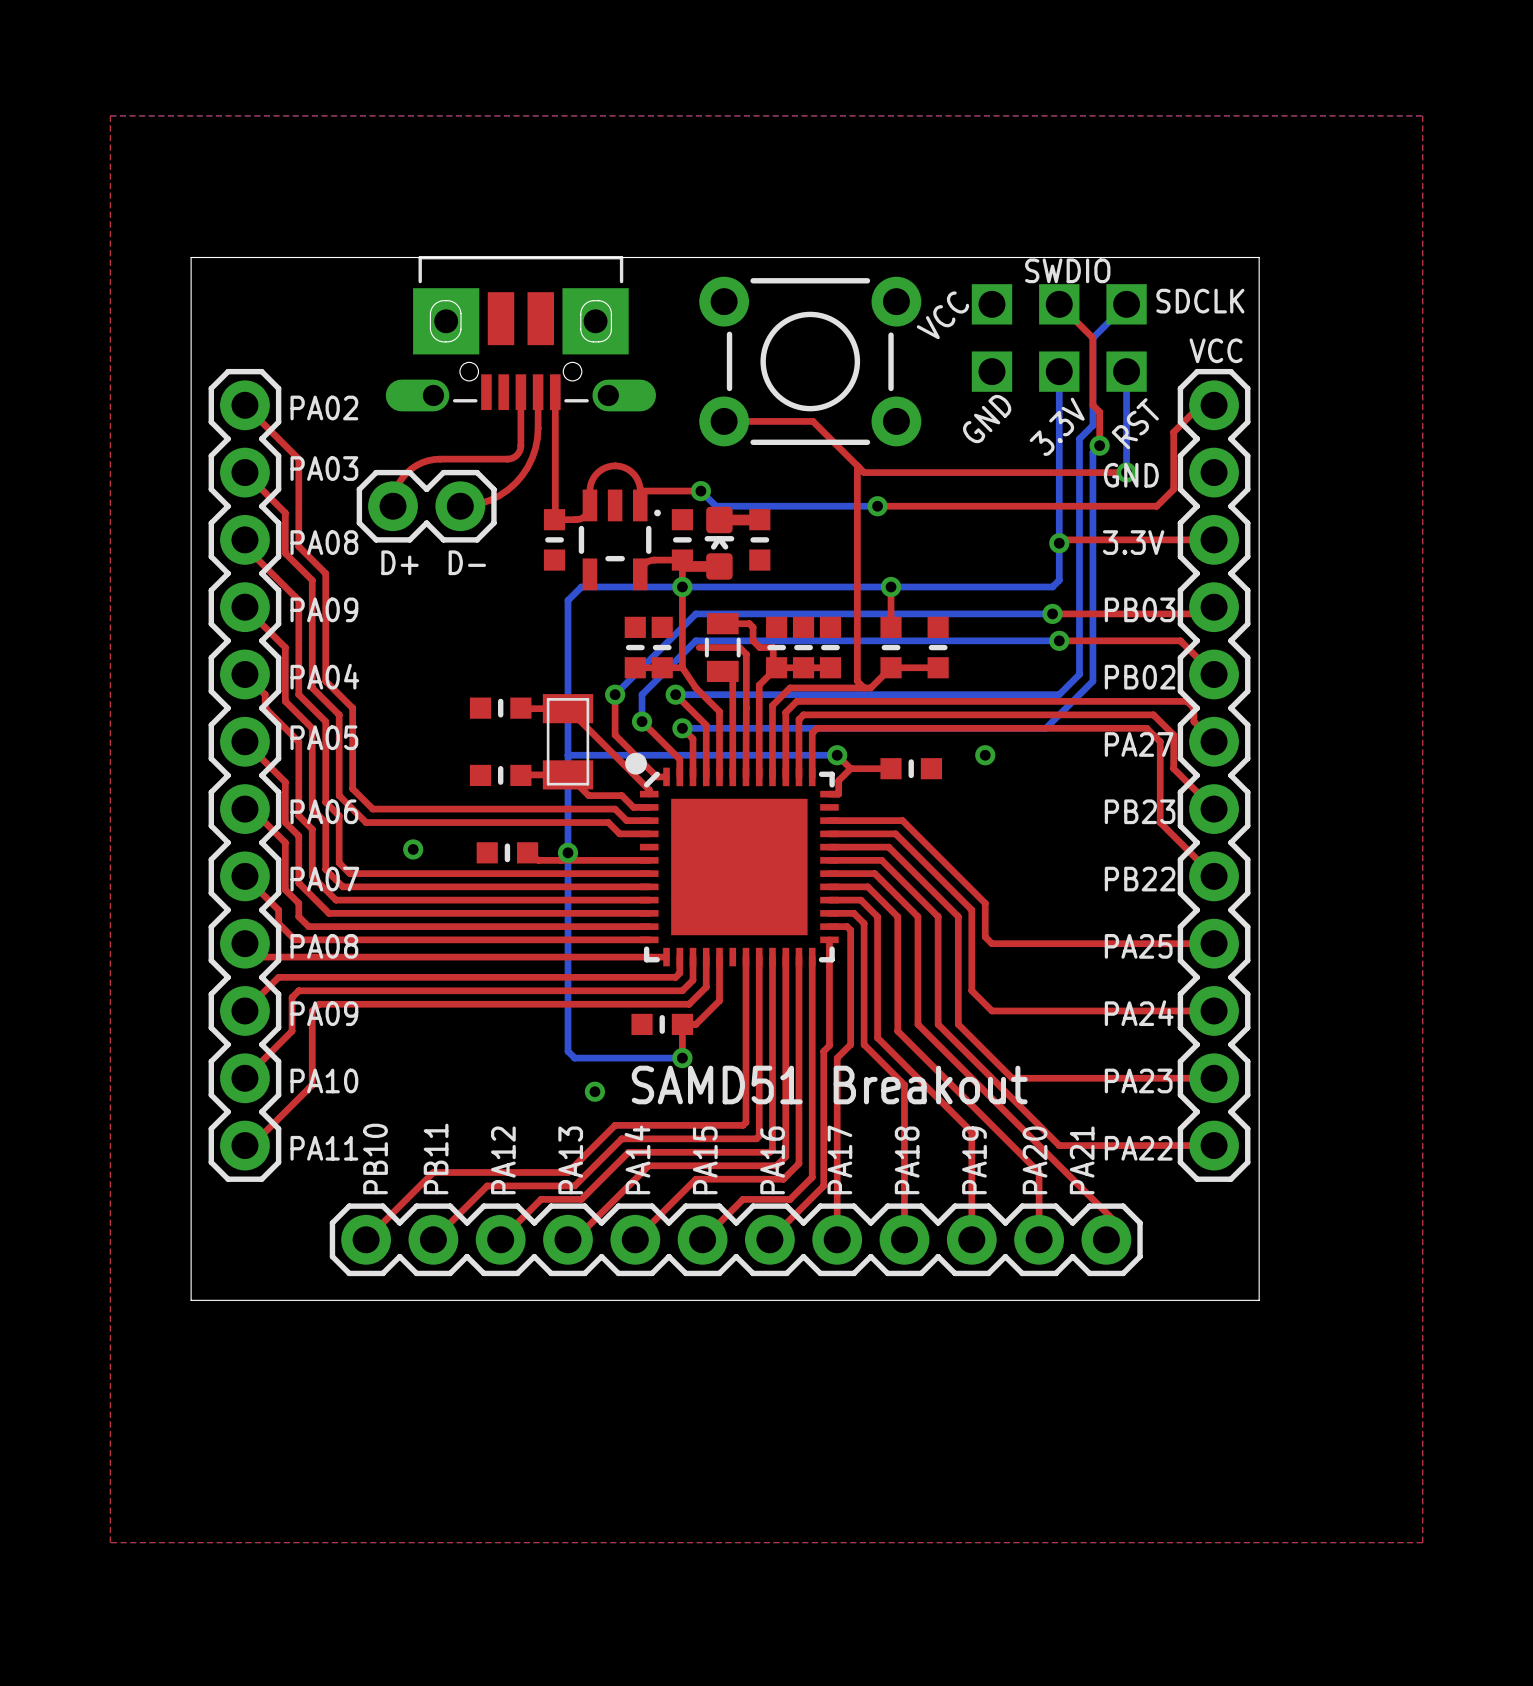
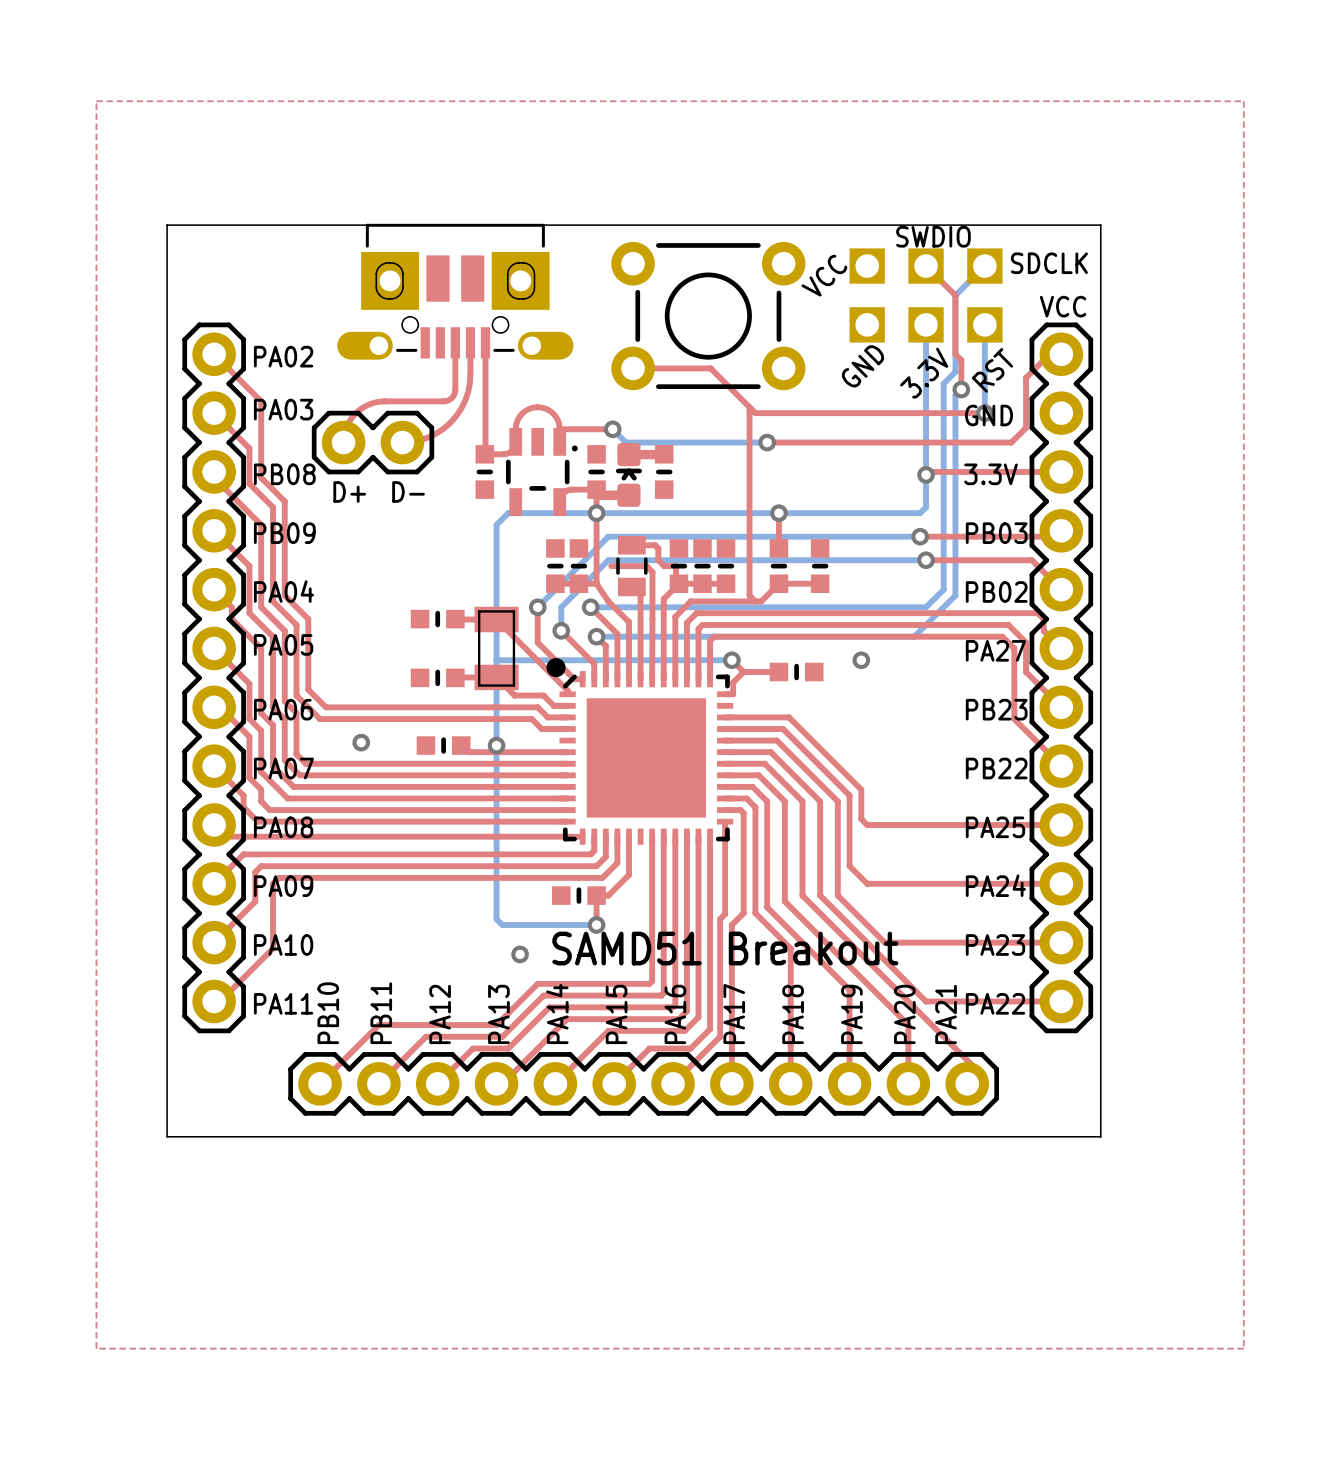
text: PA08 (324, 542) -> PB08 (284, 474)
text: PA09 (324, 609) -> PB09 (284, 533)

